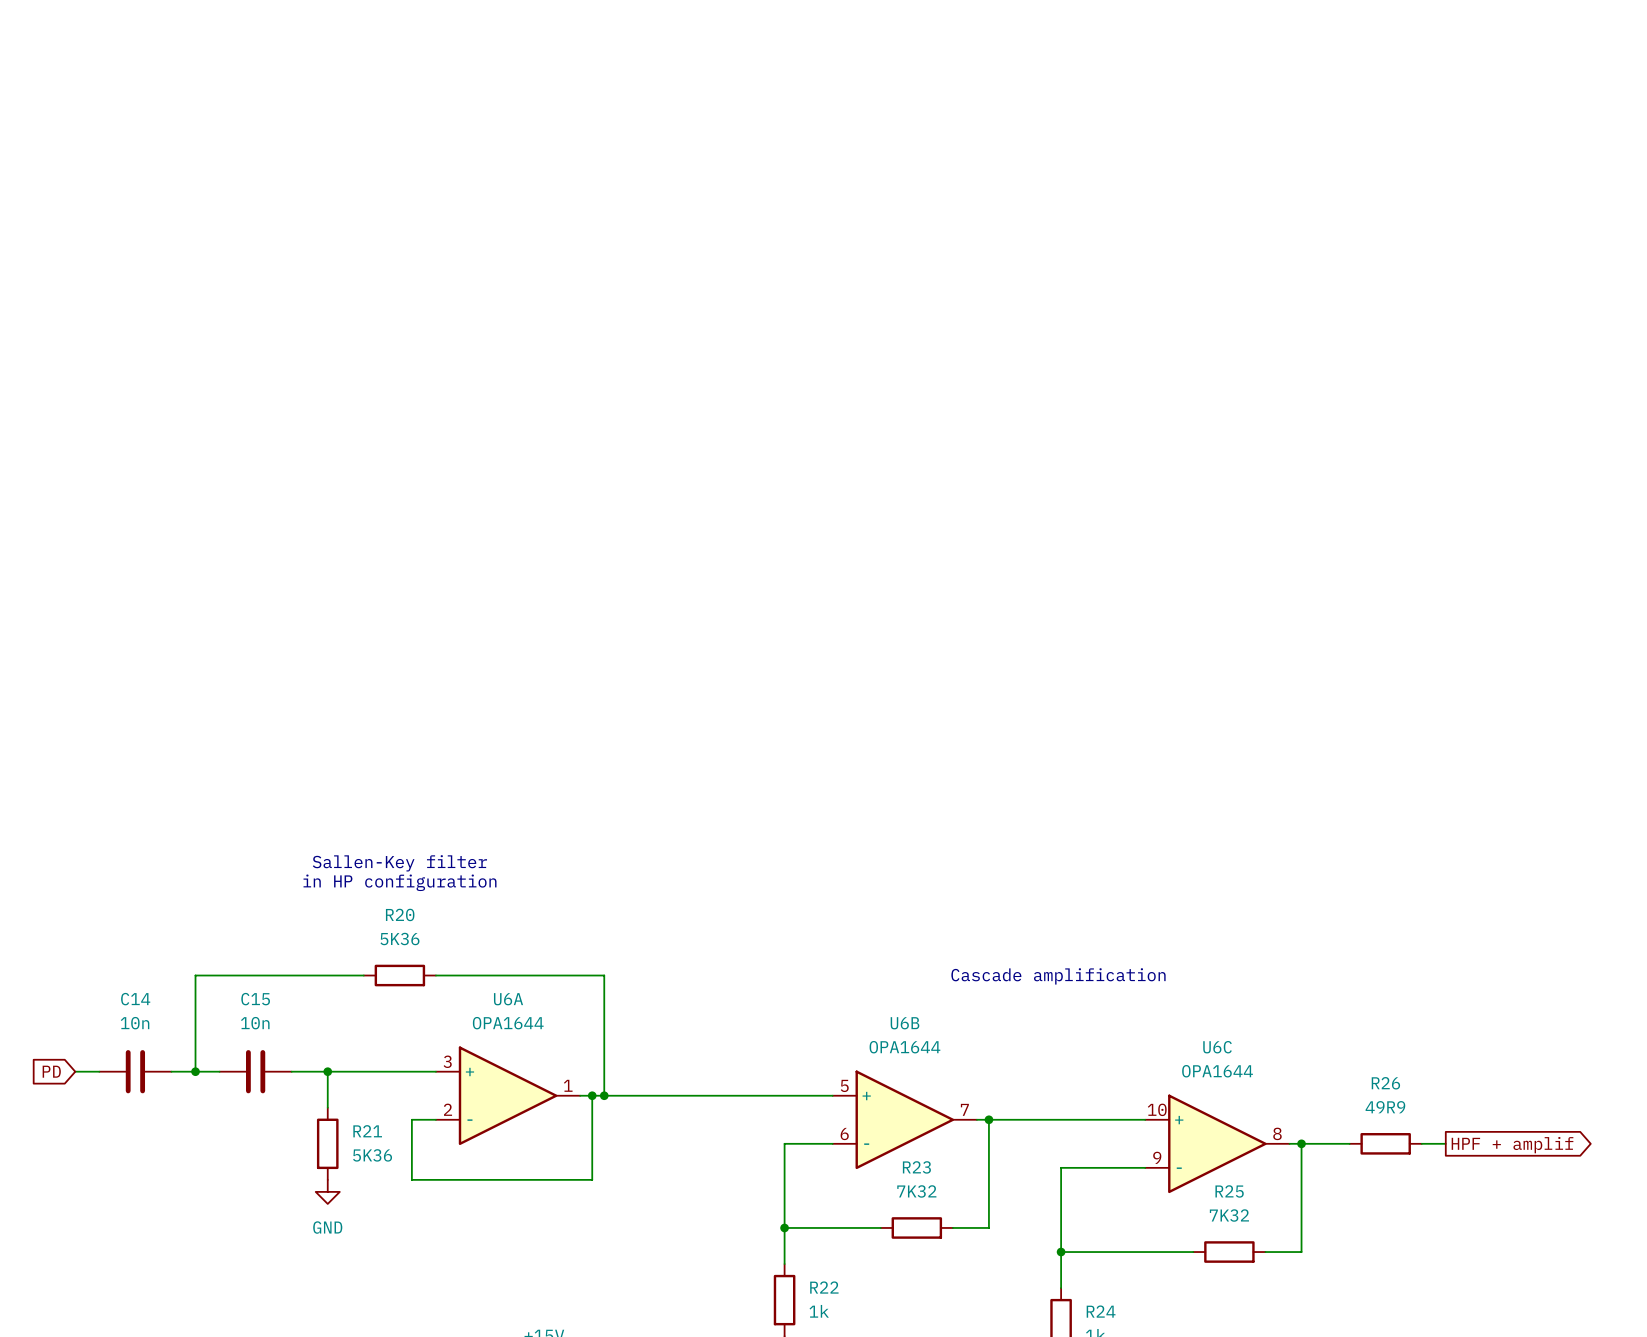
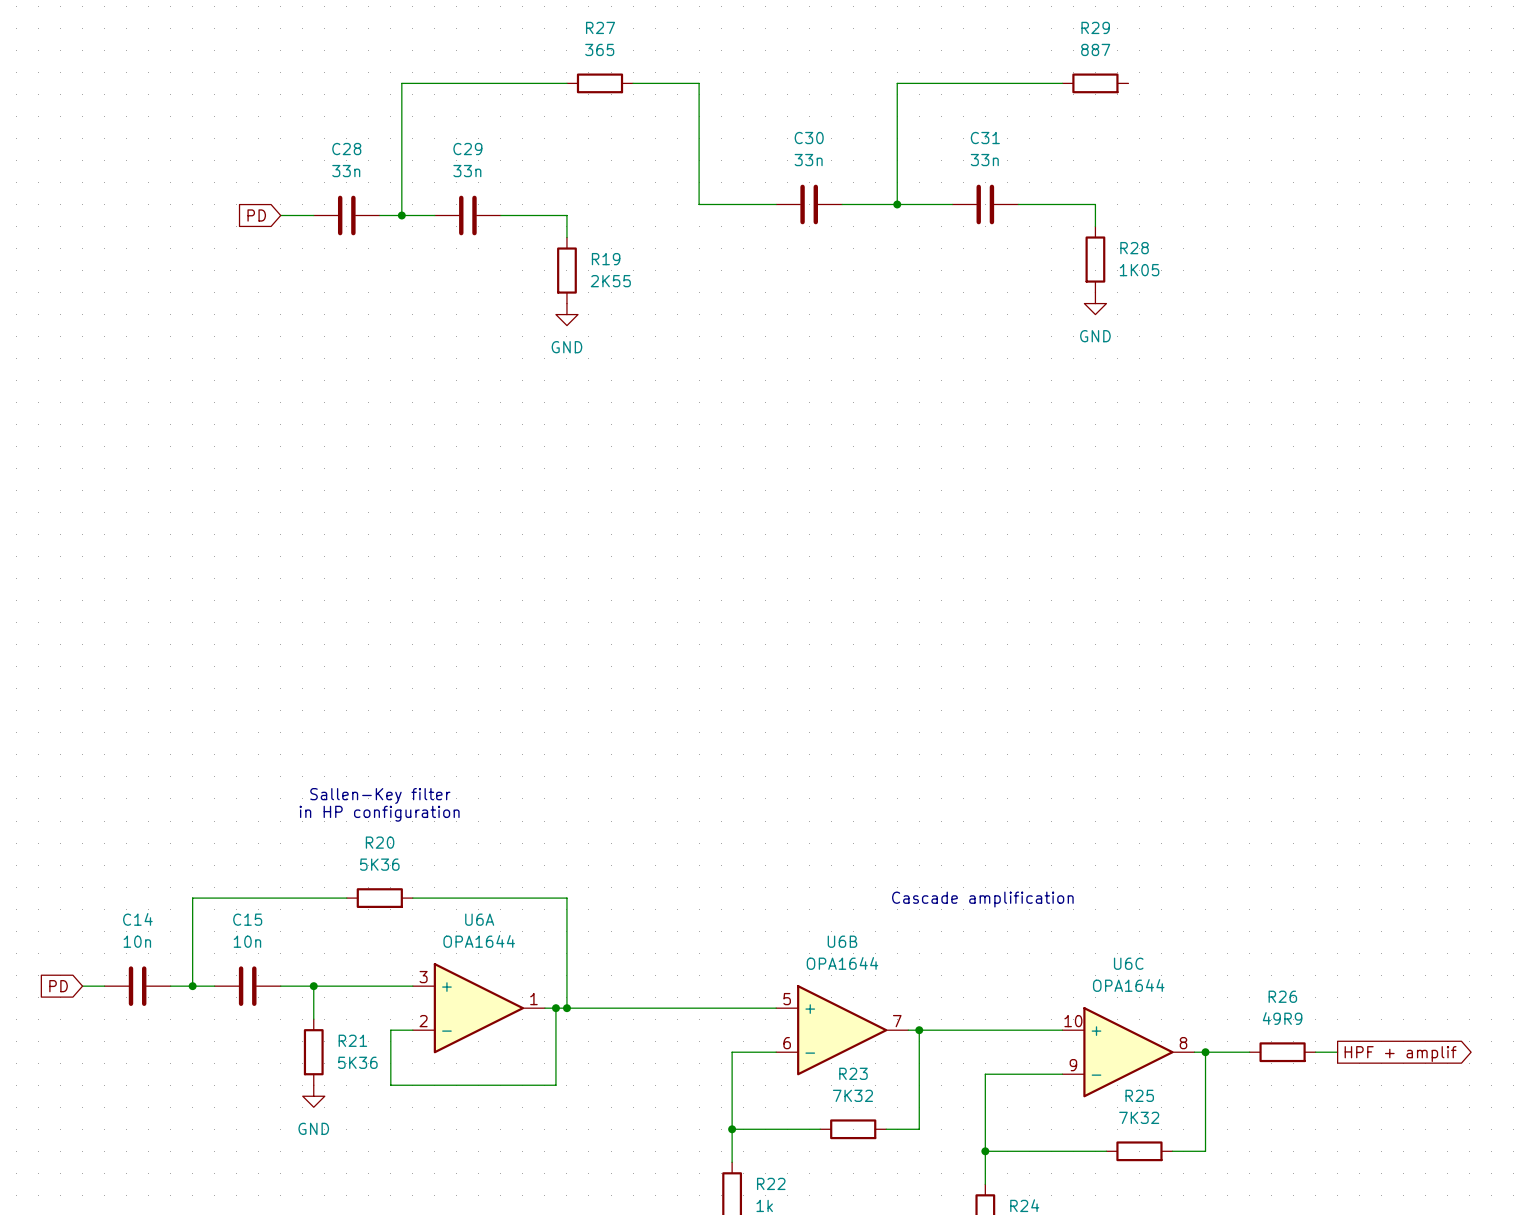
wire: none -> (566, 83) (401, 83) (401, 215)
R27: none -> 365 (600, 83)
wire: none -> (633, 83) (699, 83) (699, 204) (776, 204)
wire: none -> (1062, 83) (897, 83) (897, 204)
R29: none -> 887 (1095, 83)
C30: none -> 33n (809, 204)
wire: none -> (842, 204) (952, 204)
junction: none -> (897, 204)
C31: none -> 33n (985, 204)
wire: none -> (1018, 204) (1095, 204) (1095, 226)
global label: none -> PD (256, 215)
wire: none -> (280, 215) (313, 215)
C28: none -> 33n (346, 215)
wire: none -> (379, 215) (434, 215)
junction: none -> (401, 215)
C29: none -> 33n (467, 215)
wire: none -> (500, 215) (566, 215) (566, 237)
R28: none -> 1K05 (1095, 259)
R19: none -> 2K55 (566, 270)
power symbol: none -> GND (1095, 303)
power symbol: none -> GND (566, 314)

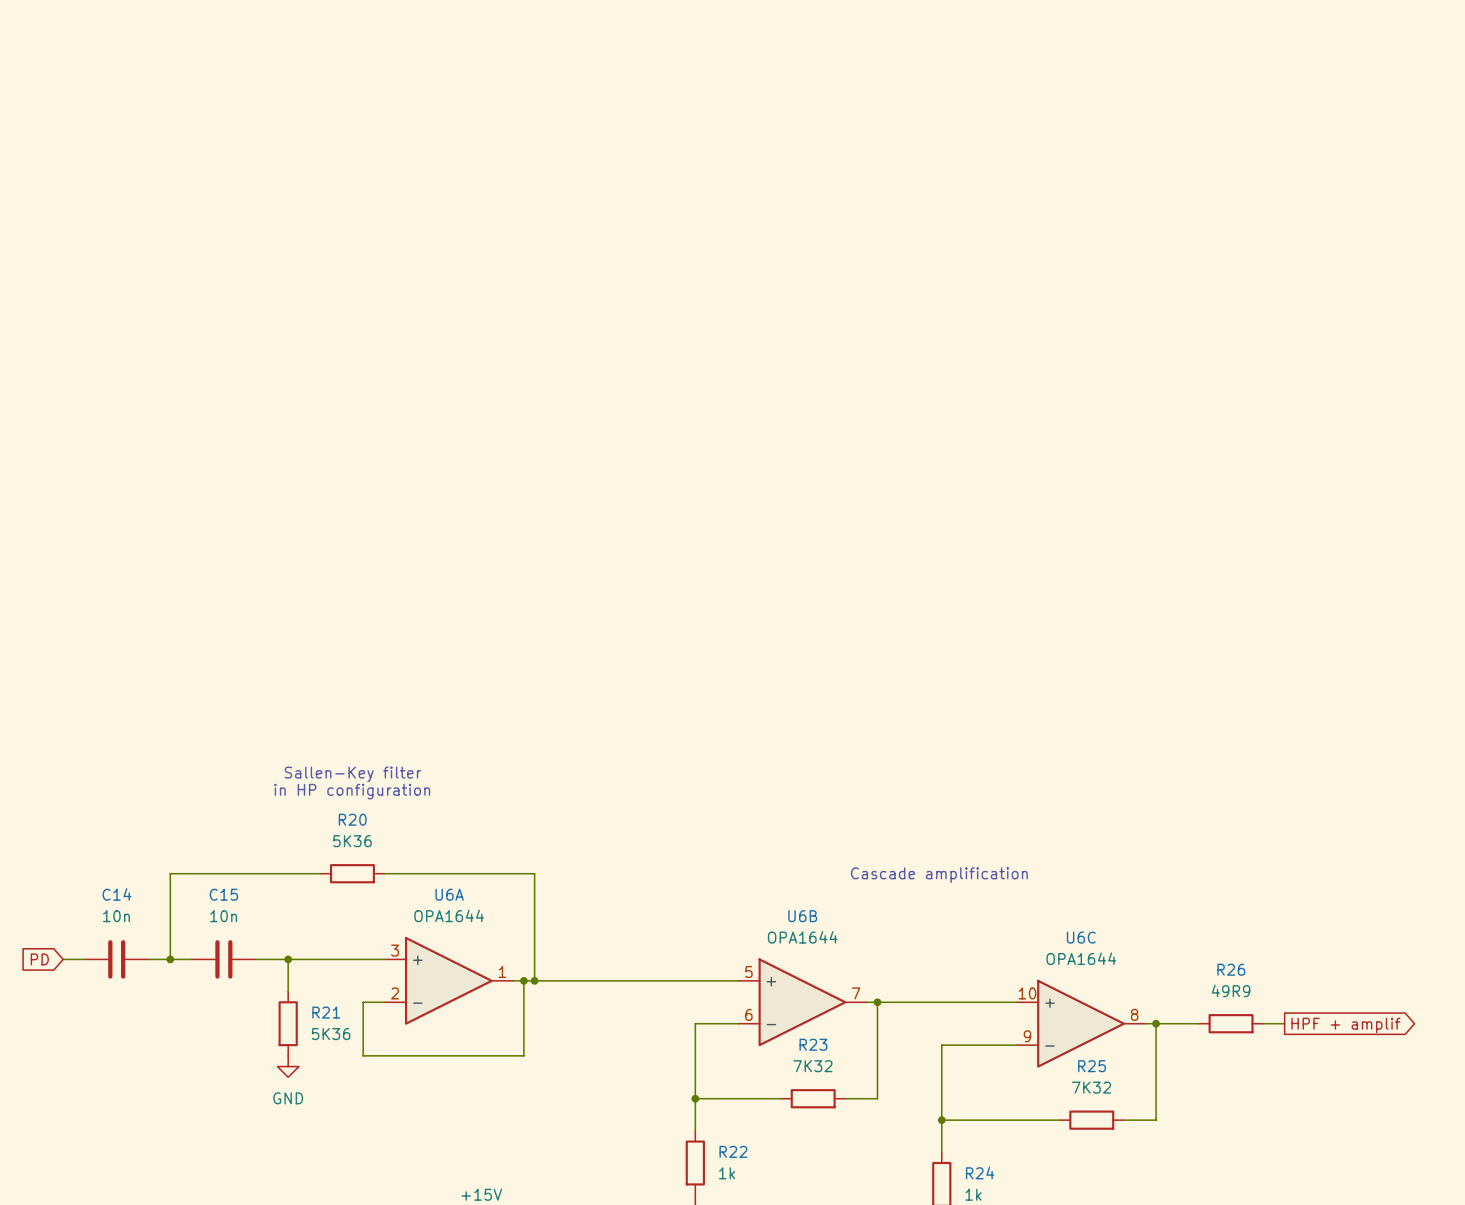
wire: (566, 83) (401, 83) (401, 215) -> none
R27: 365 (600, 83) -> none
wire: (633, 83) (699, 83) (699, 204) (776, 204) -> none
wire: (1062, 83) (897, 83) (897, 204) -> none
R29: 887 (1095, 83) -> none
C30: 33n (809, 204) -> none
wire: (842, 204) (952, 204) -> none
junction: (897, 204) -> none
C31: 33n (985, 204) -> none
wire: (1018, 204) (1095, 204) (1095, 226) -> none
global label: PD (256, 215) -> none
wire: (280, 215) (313, 215) -> none
C28: 33n (346, 215) -> none
wire: (379, 215) (434, 215) -> none
junction: (401, 215) -> none
C29: 33n (467, 215) -> none
wire: (500, 215) (566, 215) (566, 237) -> none
R28: 1K05 (1095, 259) -> none
R19: 2K55 (566, 270) -> none
power symbol: GND (1095, 303) -> none
power symbol: GND (566, 314) -> none

